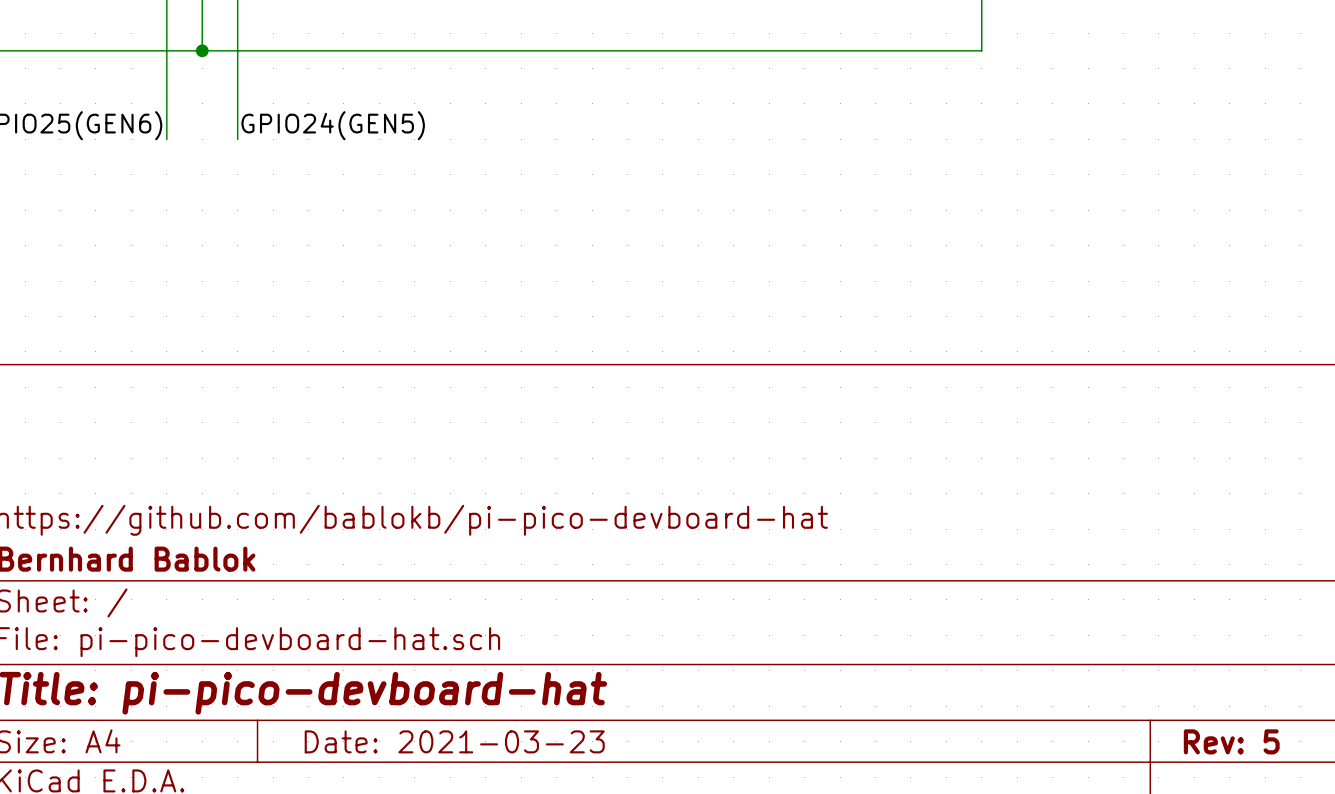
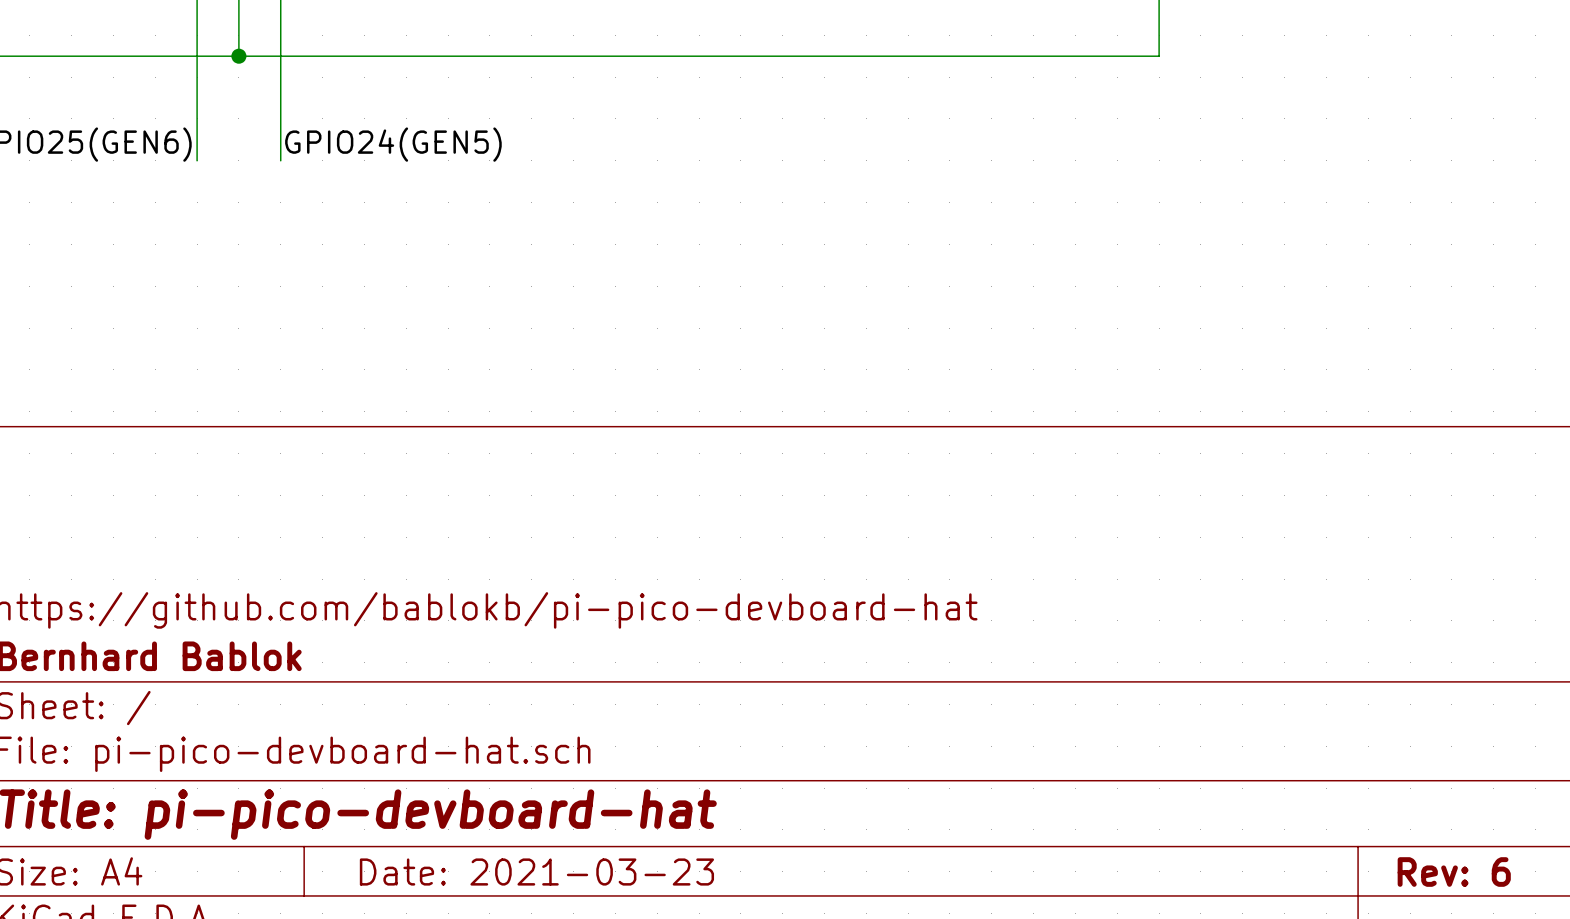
title block: Rev: 5 (1231, 741) -> Rev: 6 (1454, 872)

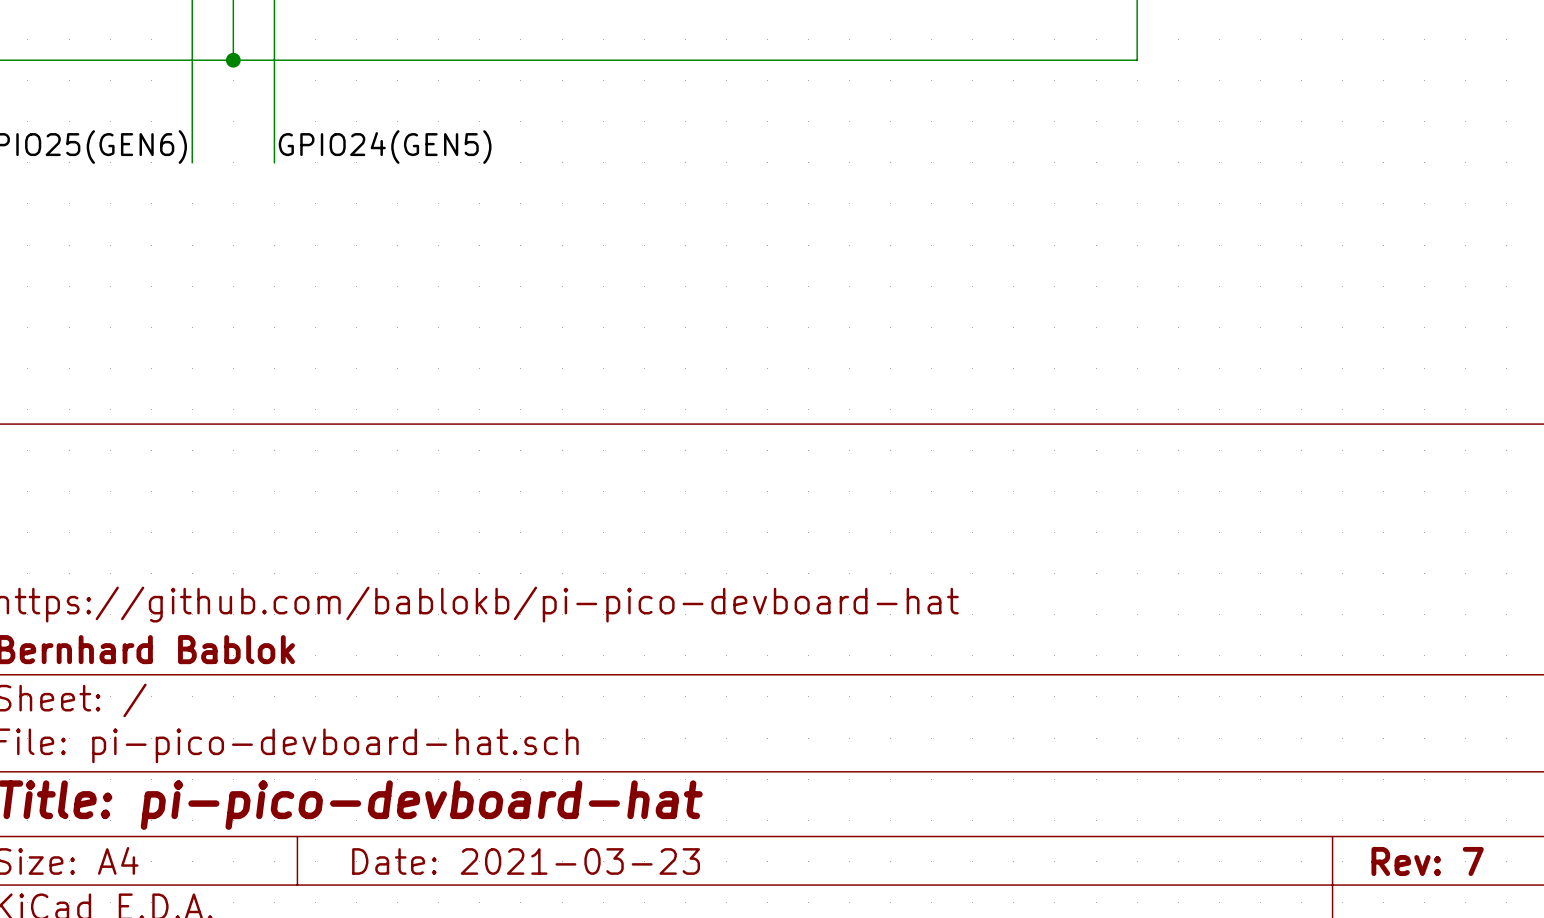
title block: Rev: 6 (1454, 872) -> Rev: 7 (1427, 861)

